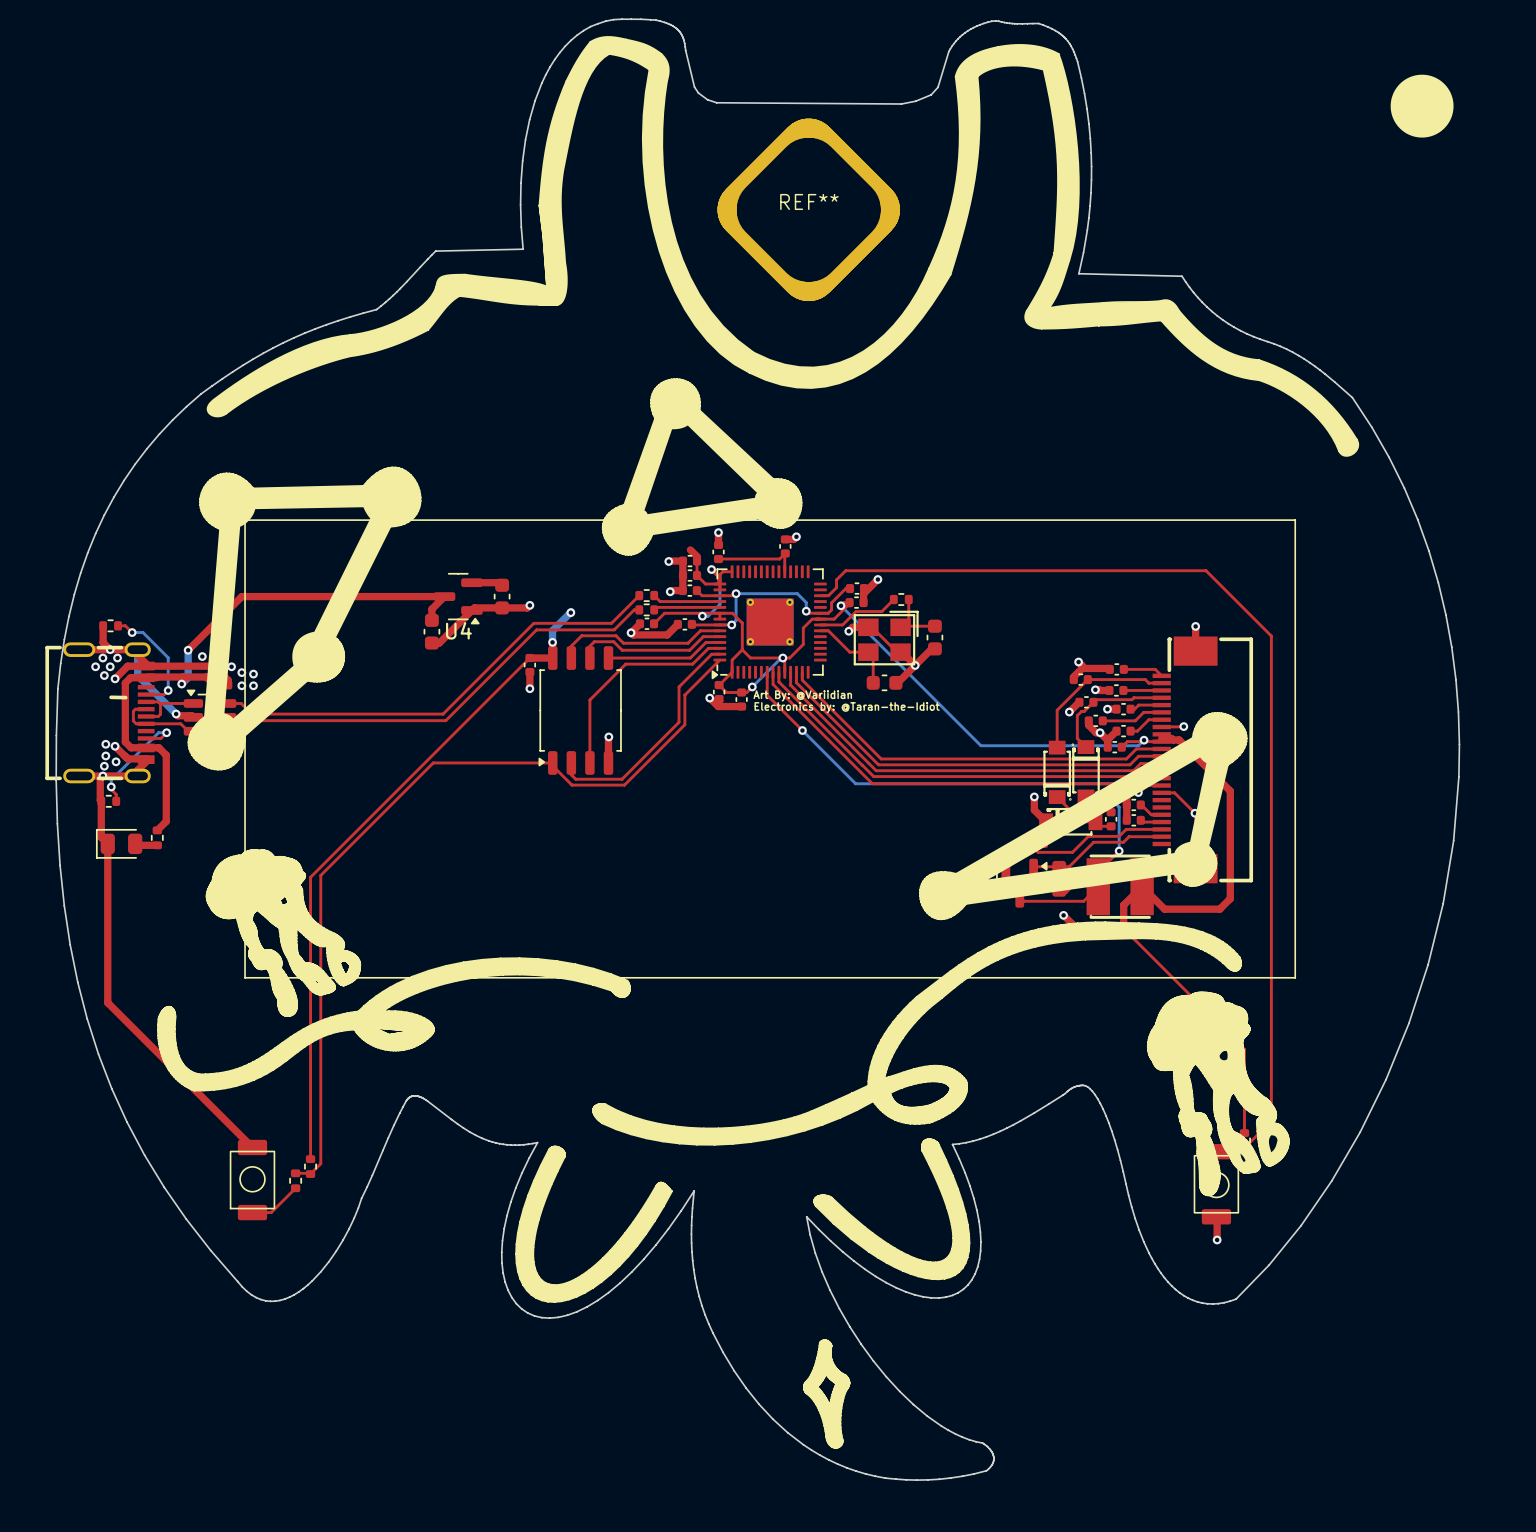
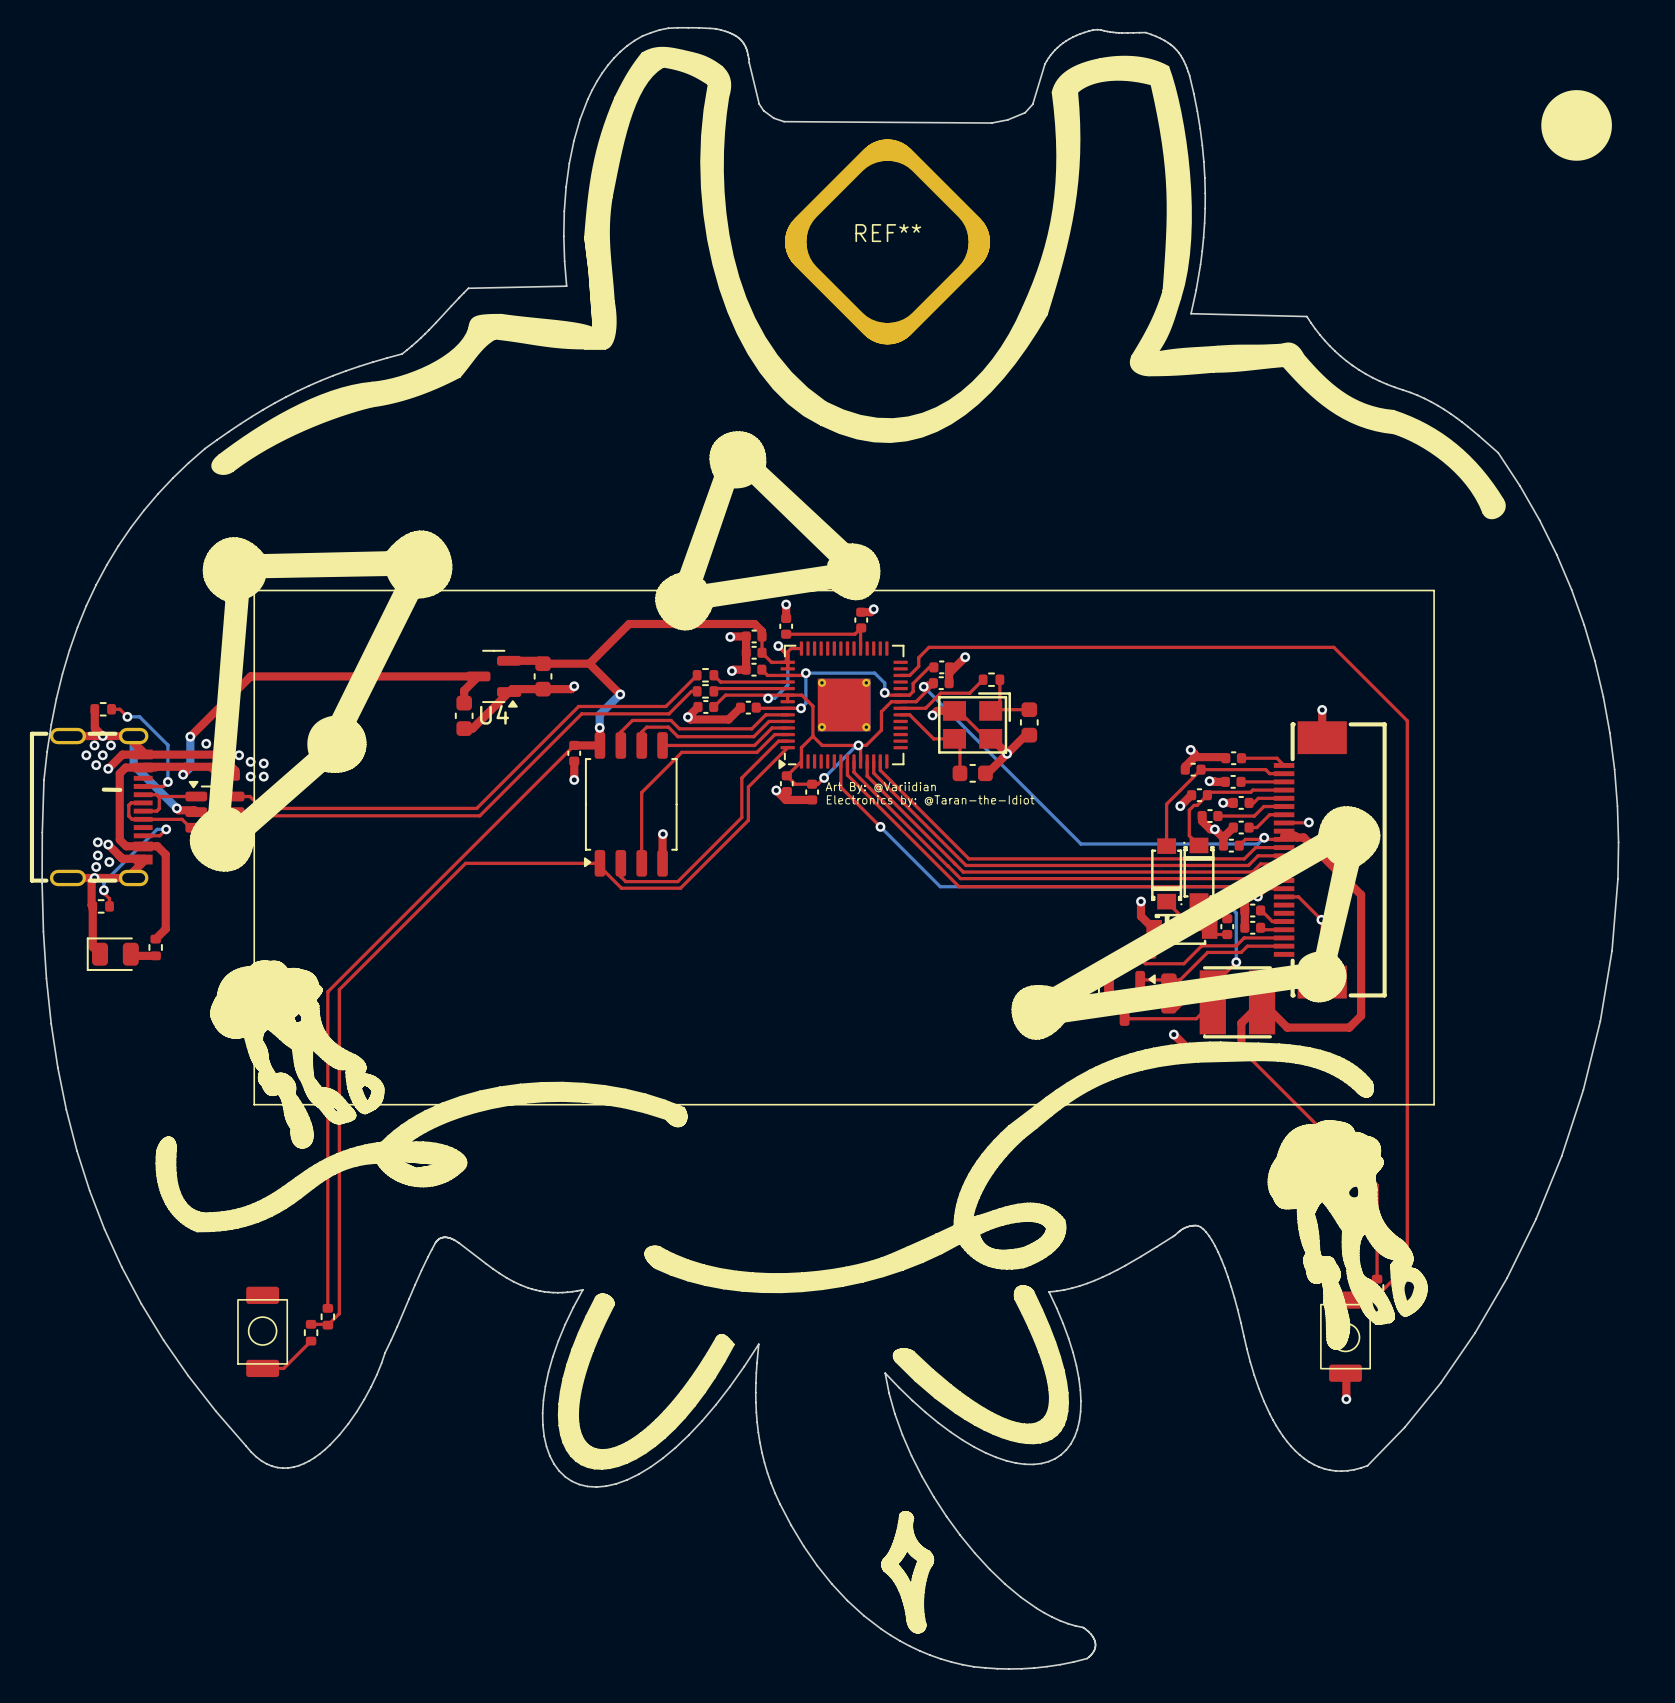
top track: none -> (754, 624) (629, 624) (589, 663)
top track: none -> (543, 663) (589, 663)
top track: none -> (589, 663) (620, 694)
top track: (107, 843) (107, 1002) (252, 1147) -> none

